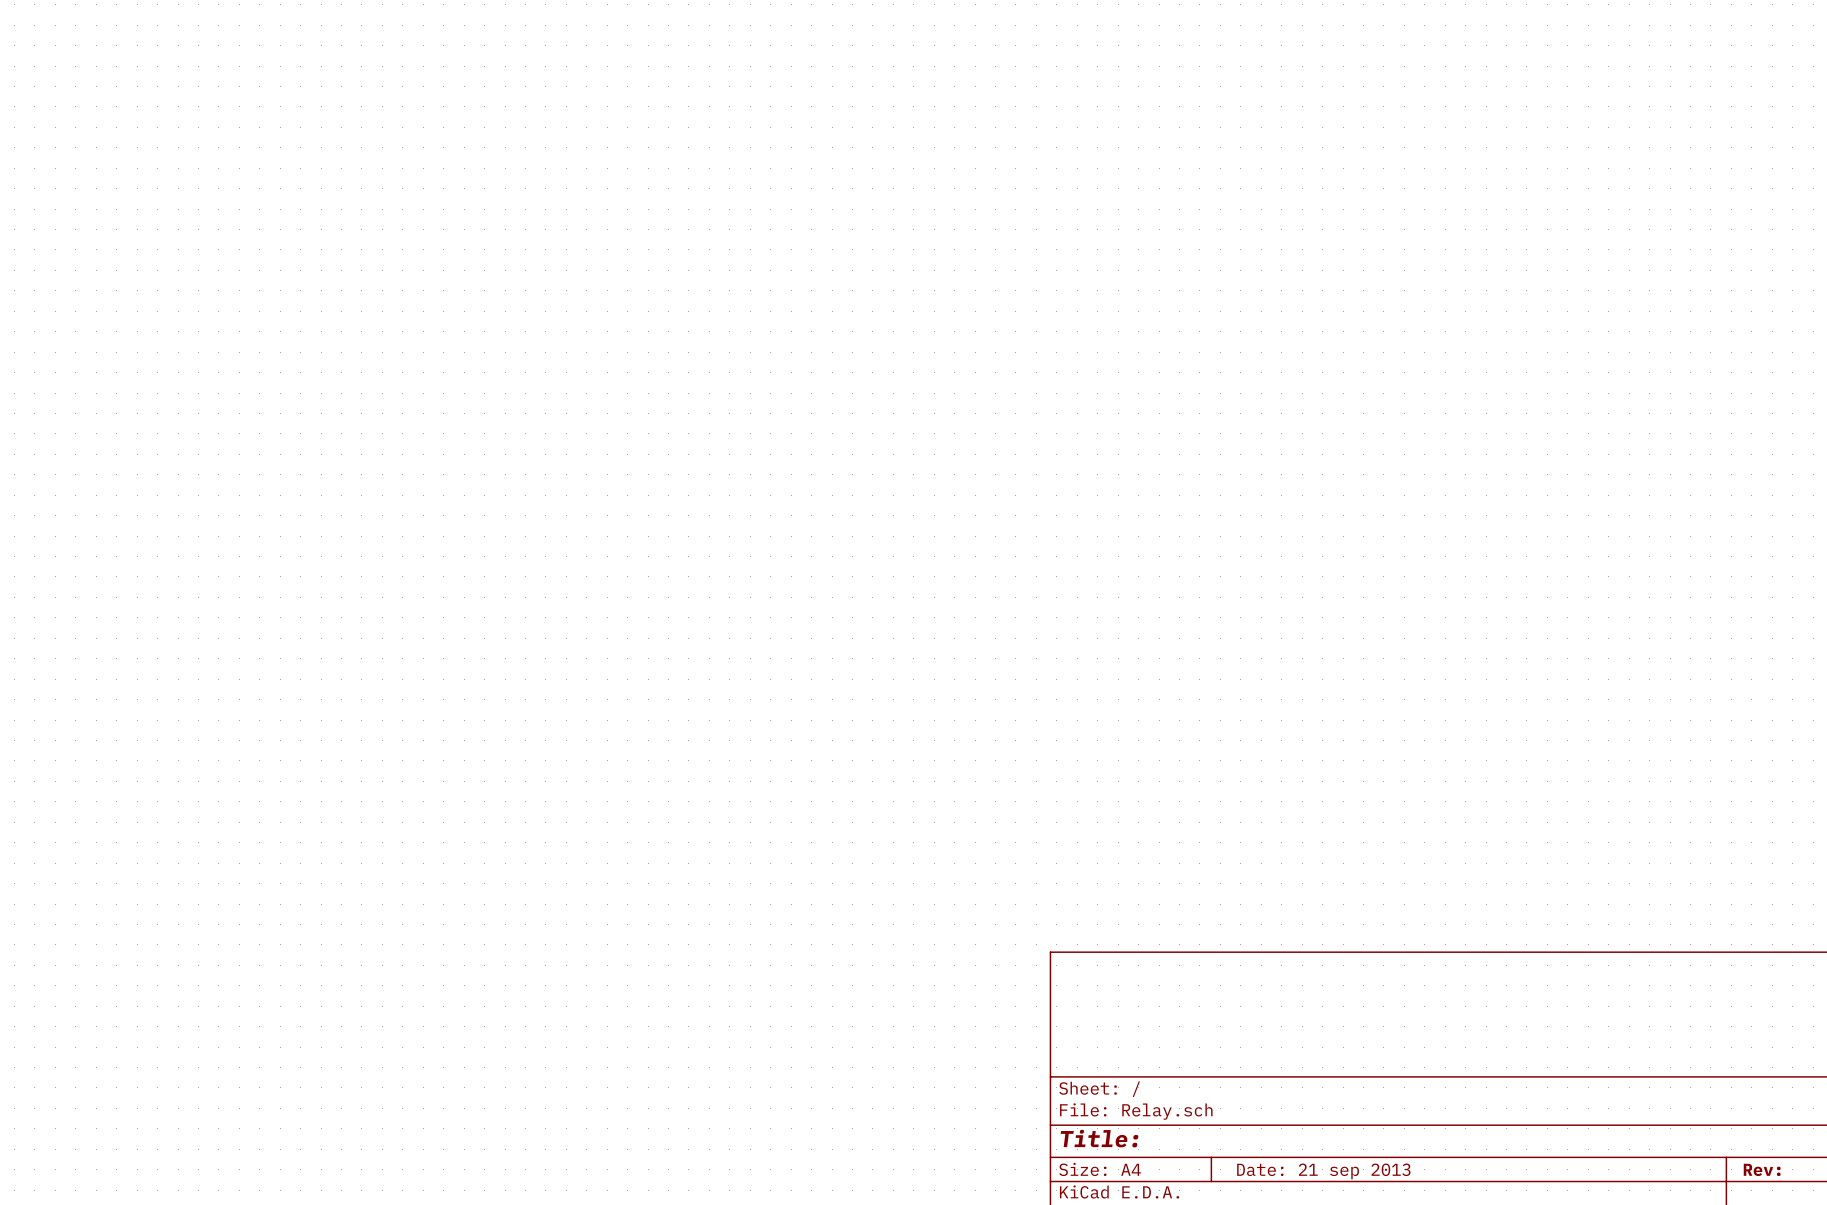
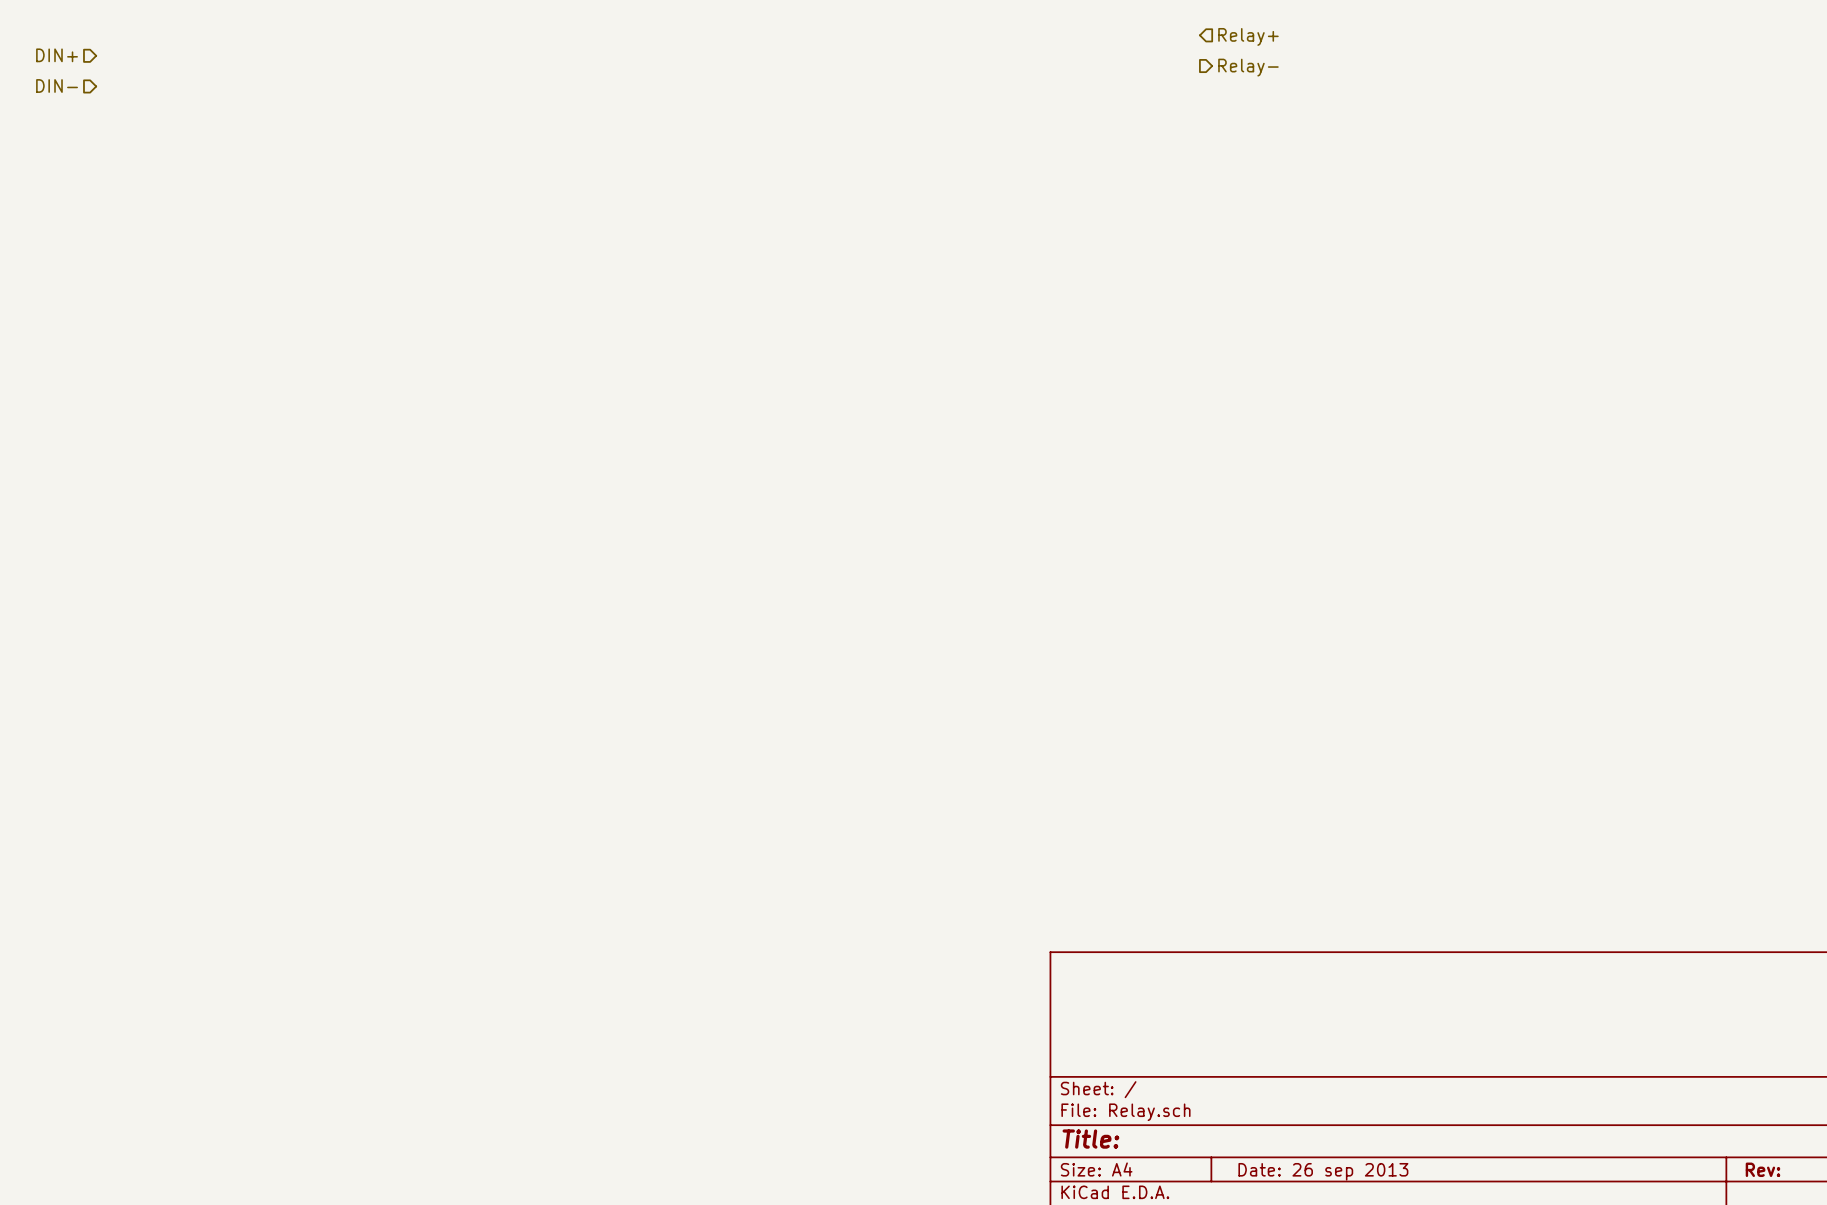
hierarchical label: none -> Relay+ (1248, 36)
hierarchical label: none -> DIN+ (57, 55)
hierarchical label: none -> Relay- (1248, 67)
hierarchical label: none -> DIN- (57, 86)
title block: Date: 21 sep 2013 (1323, 1171) -> Date: 26 sep 2013 (1323, 1171)

